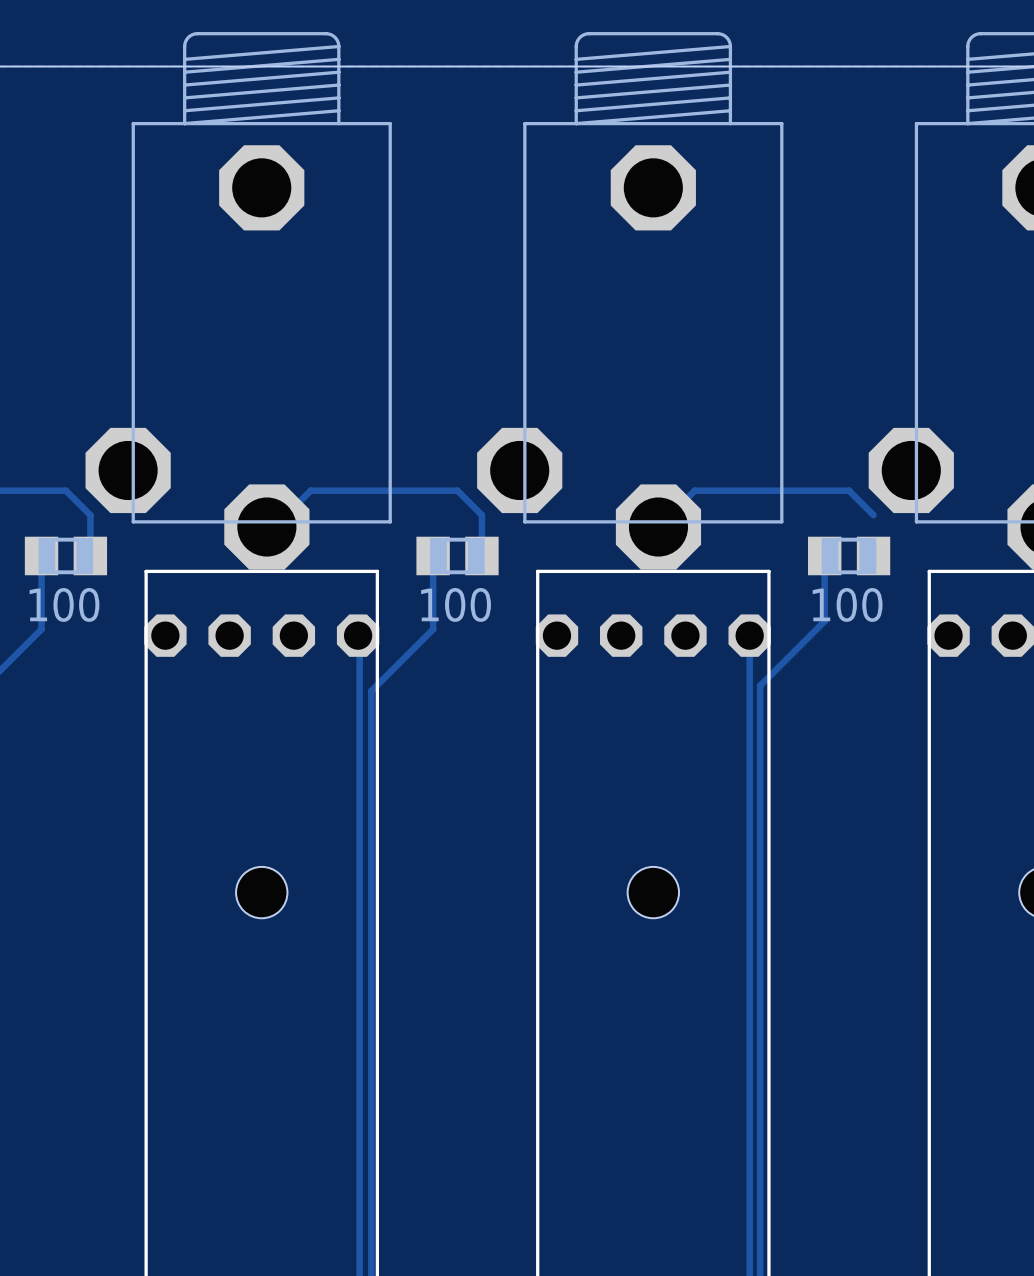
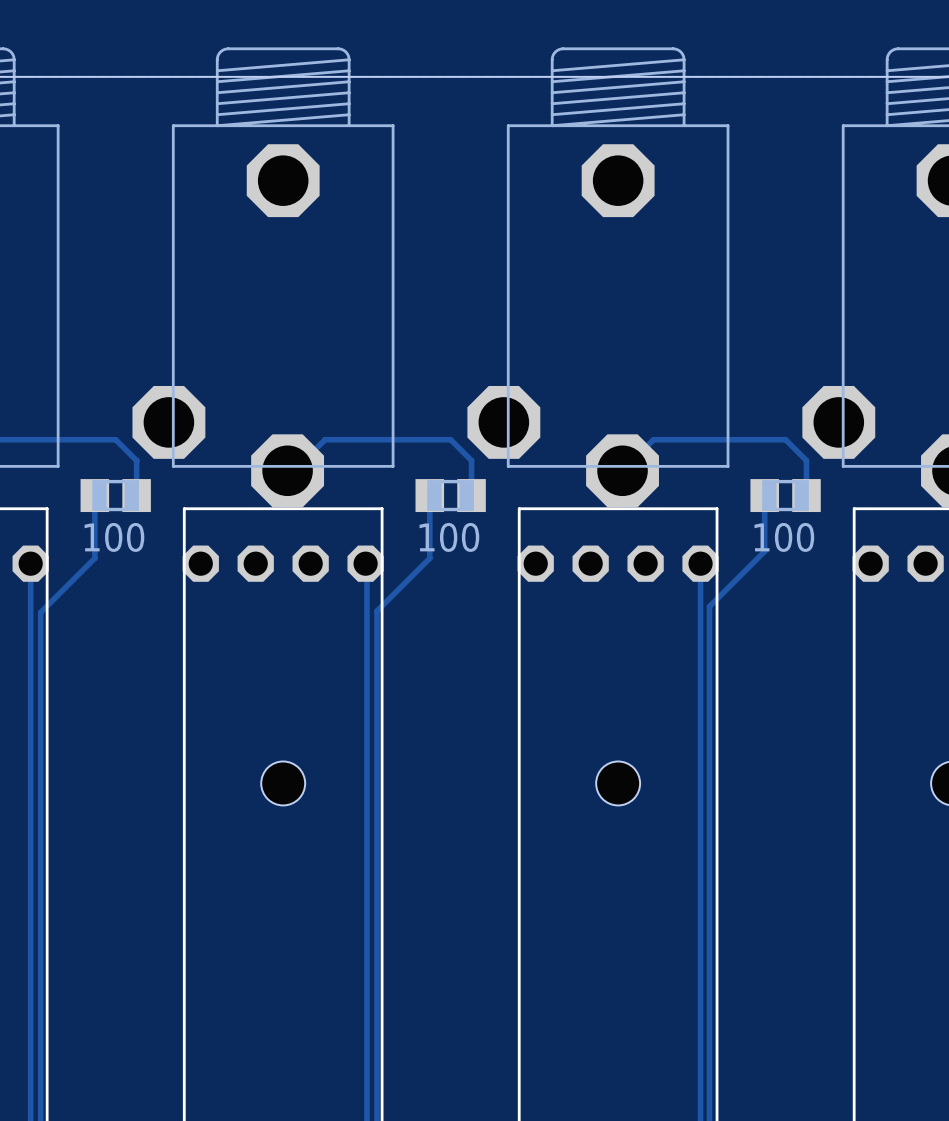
track: none -> (806, 460) (806, 495)

